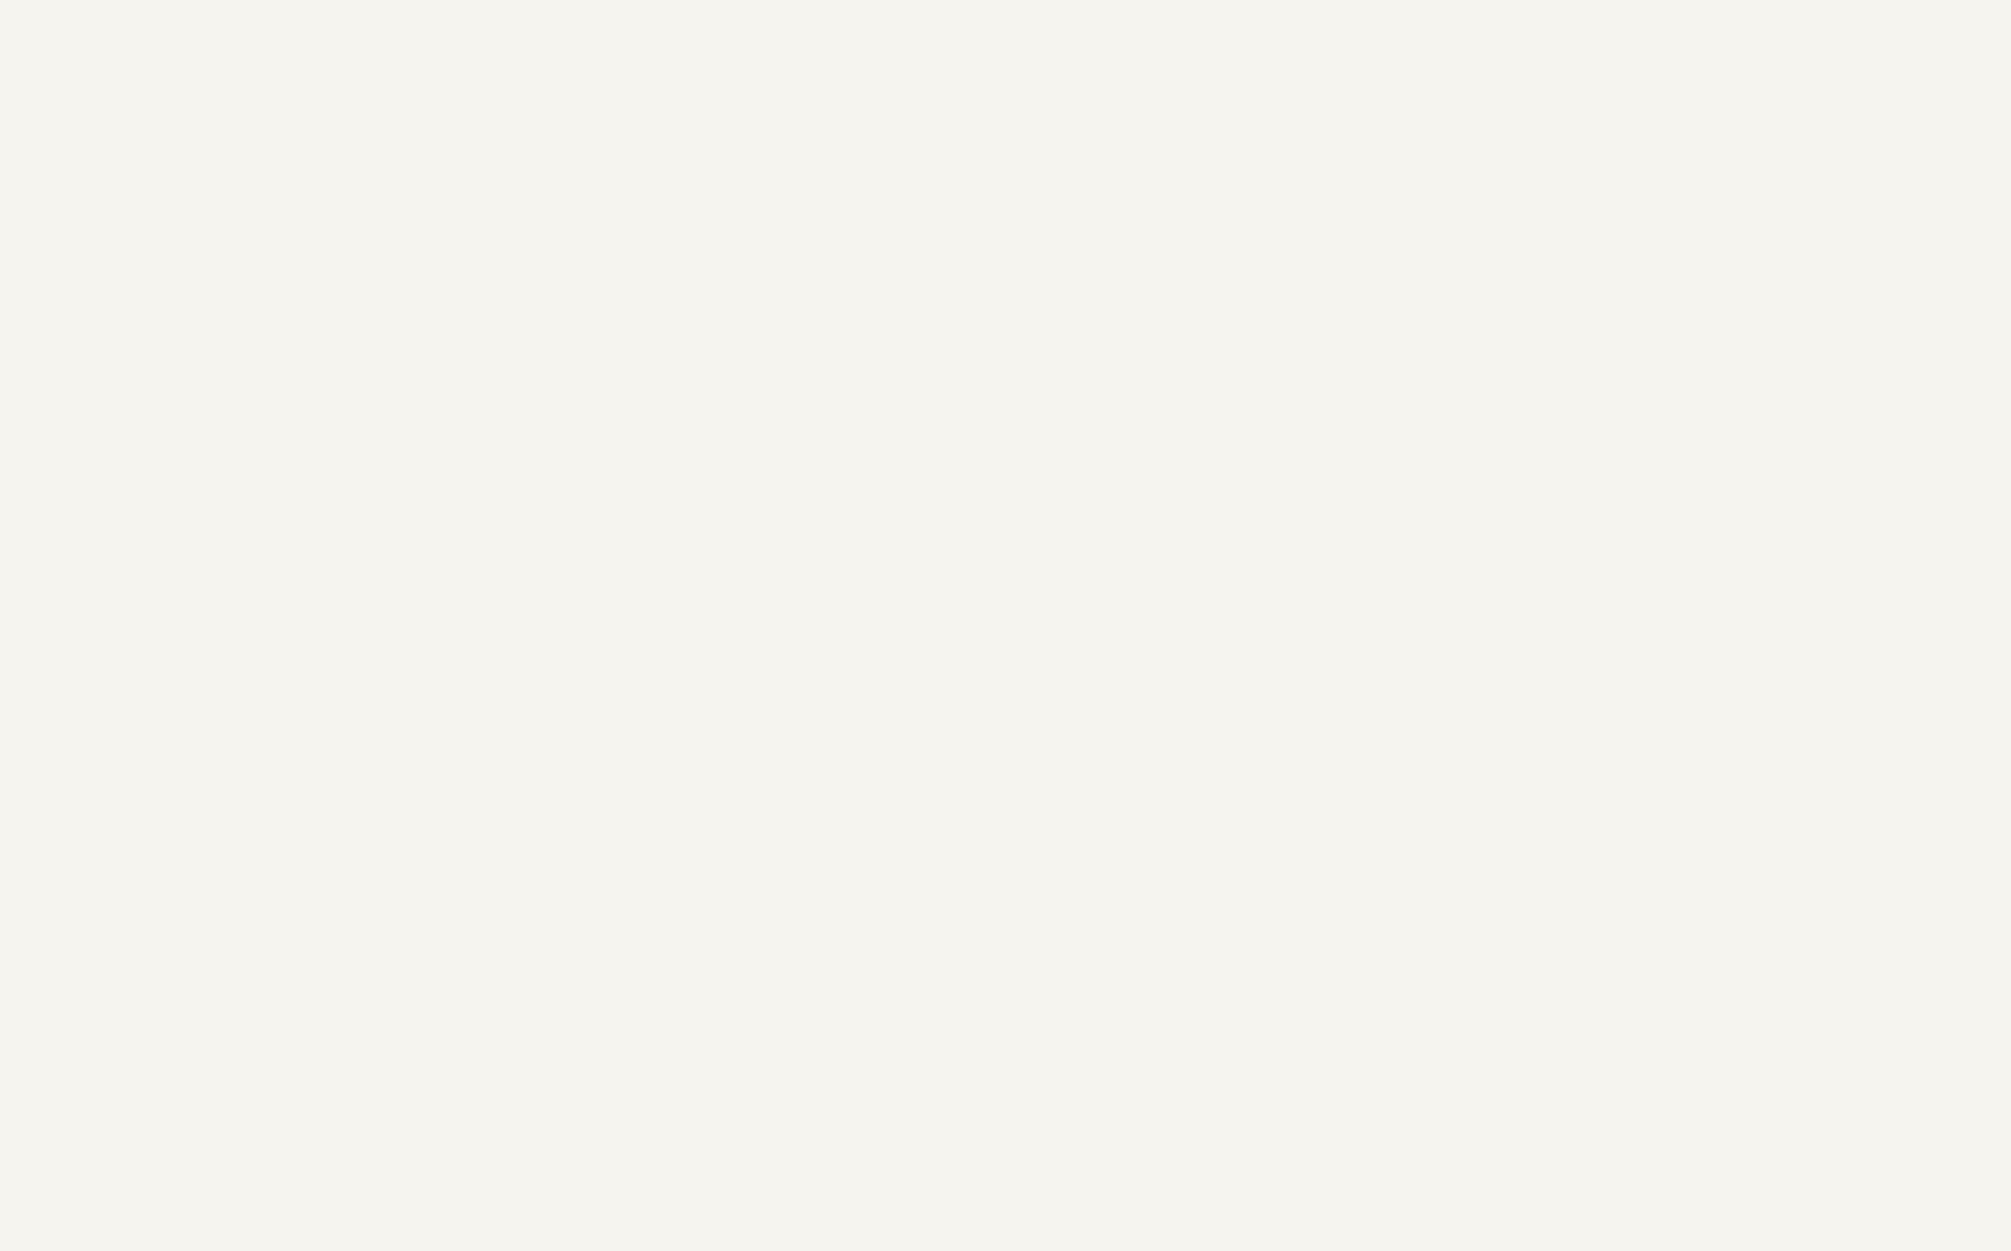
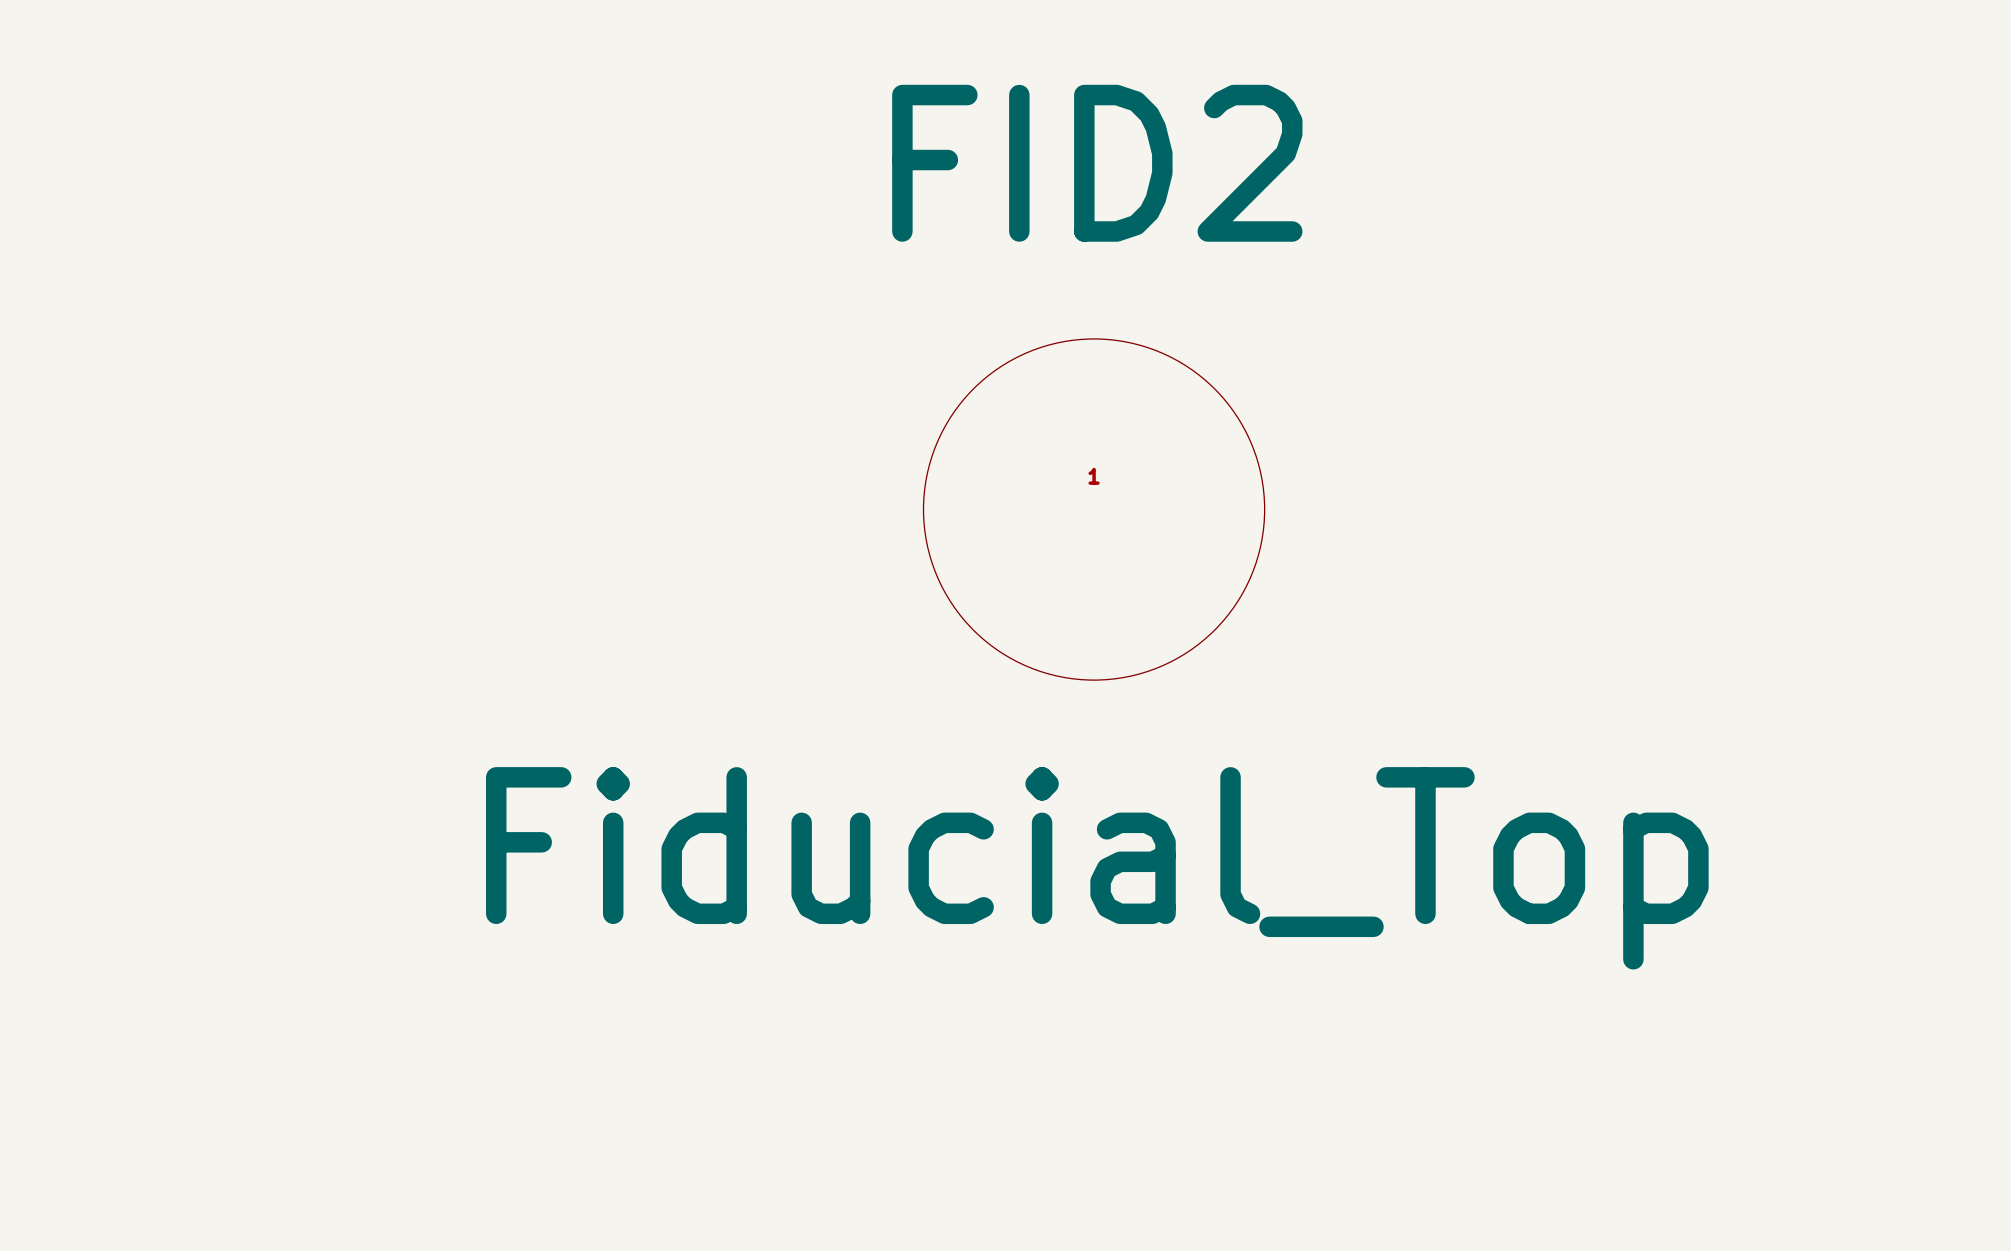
FID2: none -> Fiducial_Top (1094, 509)

